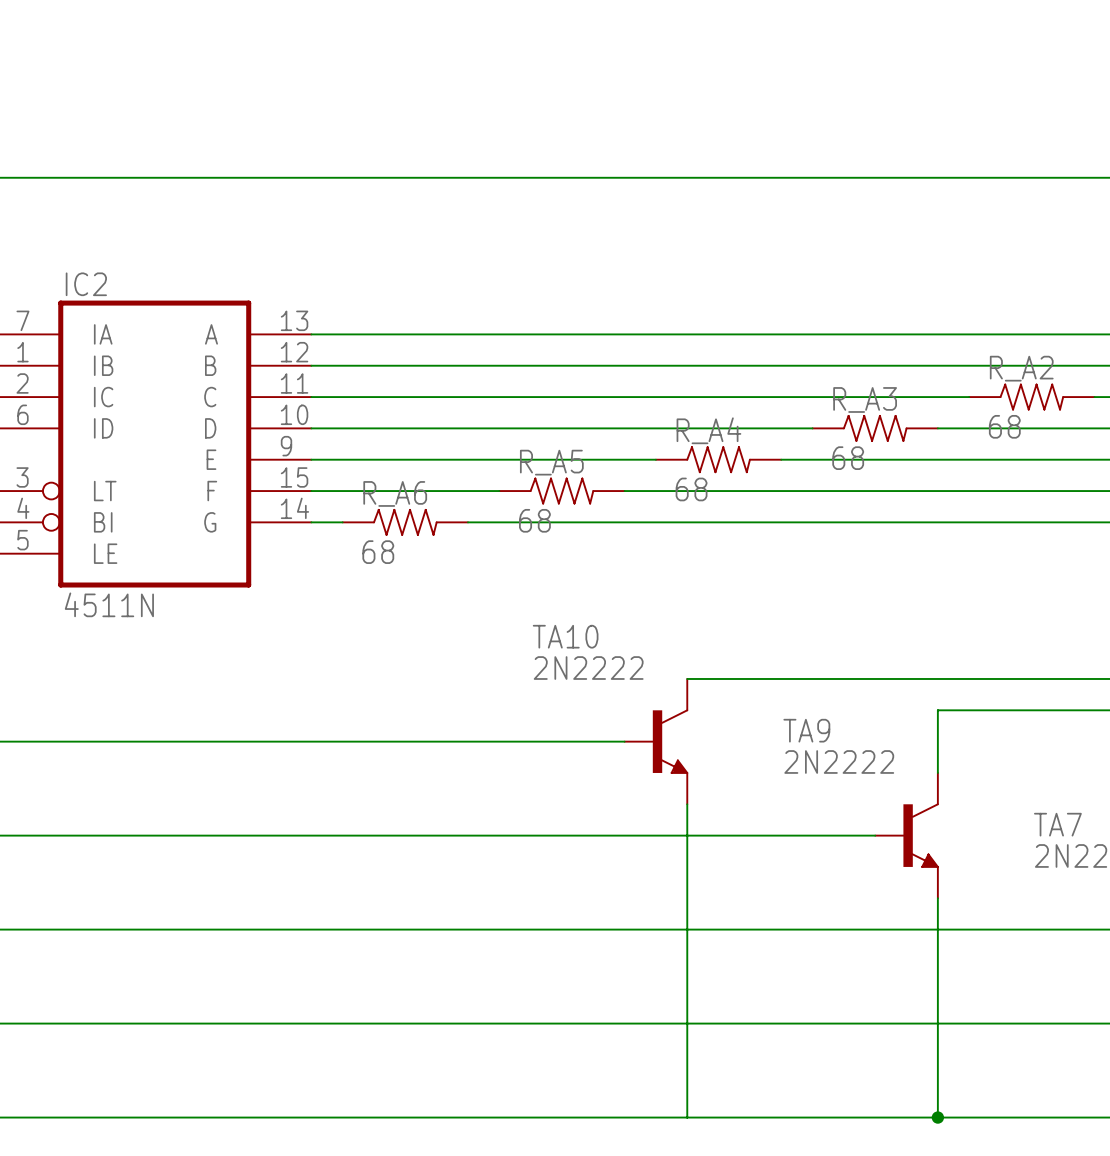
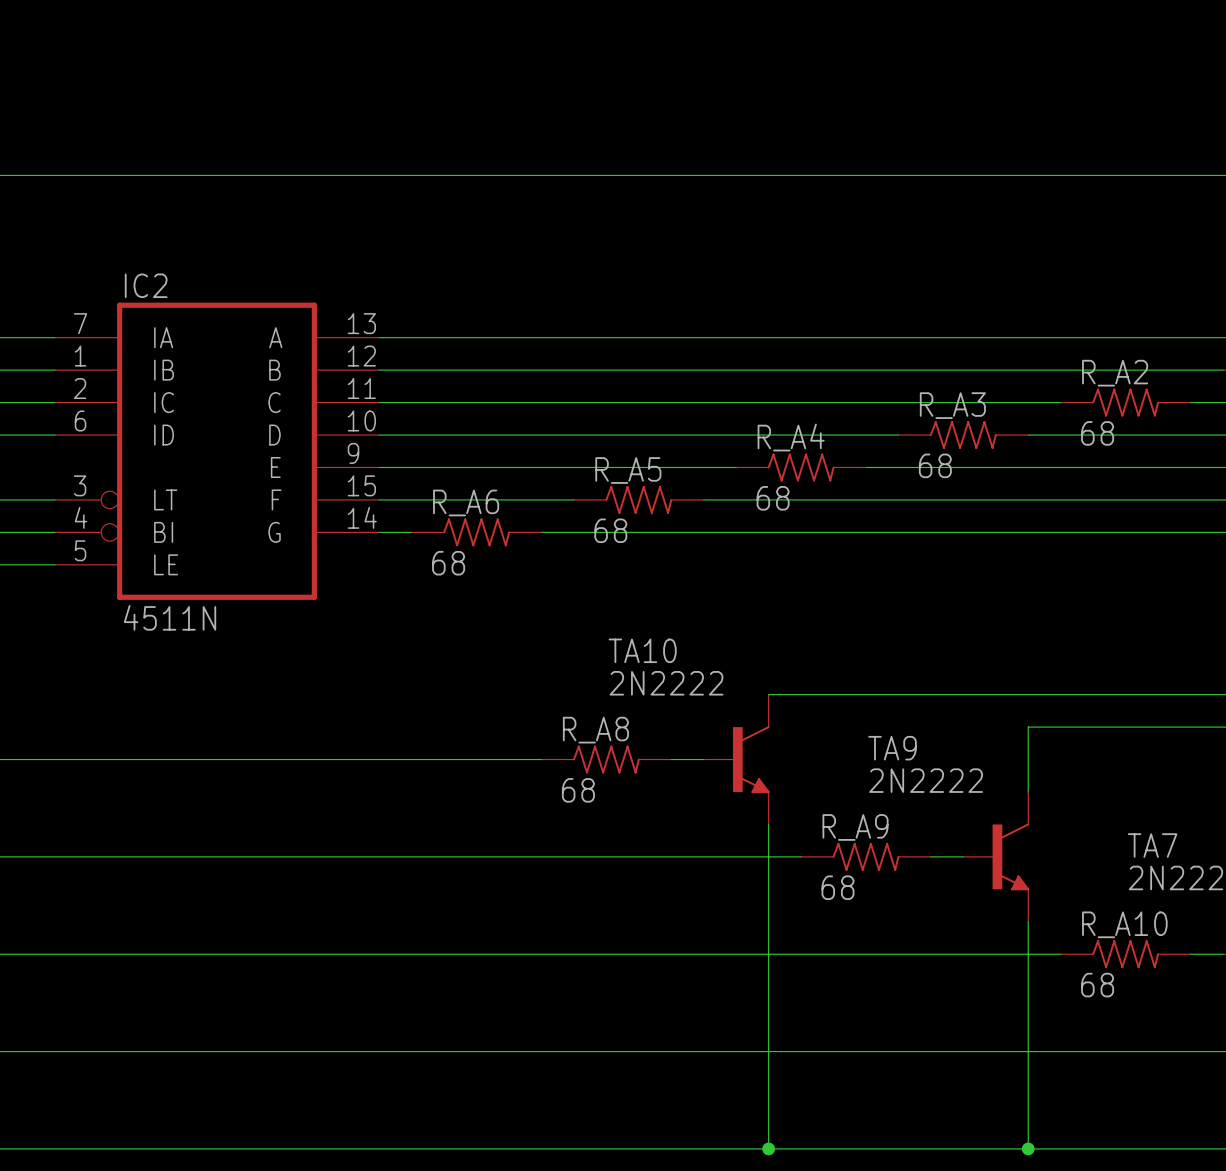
R_A8: none -> 68 (606, 759)
R_A9: none -> 68 (866, 856)
R_A10: none -> 68 (1125, 954)
junction: none -> (768, 1148)

